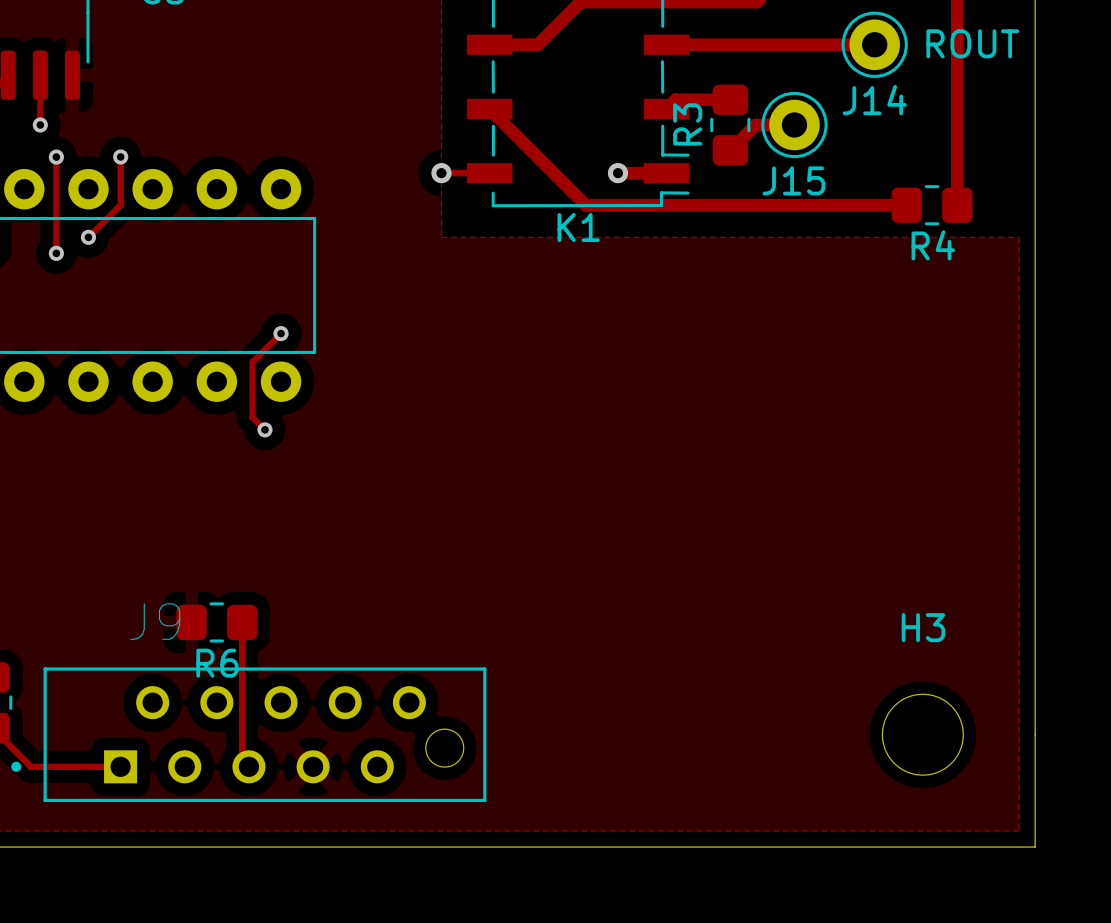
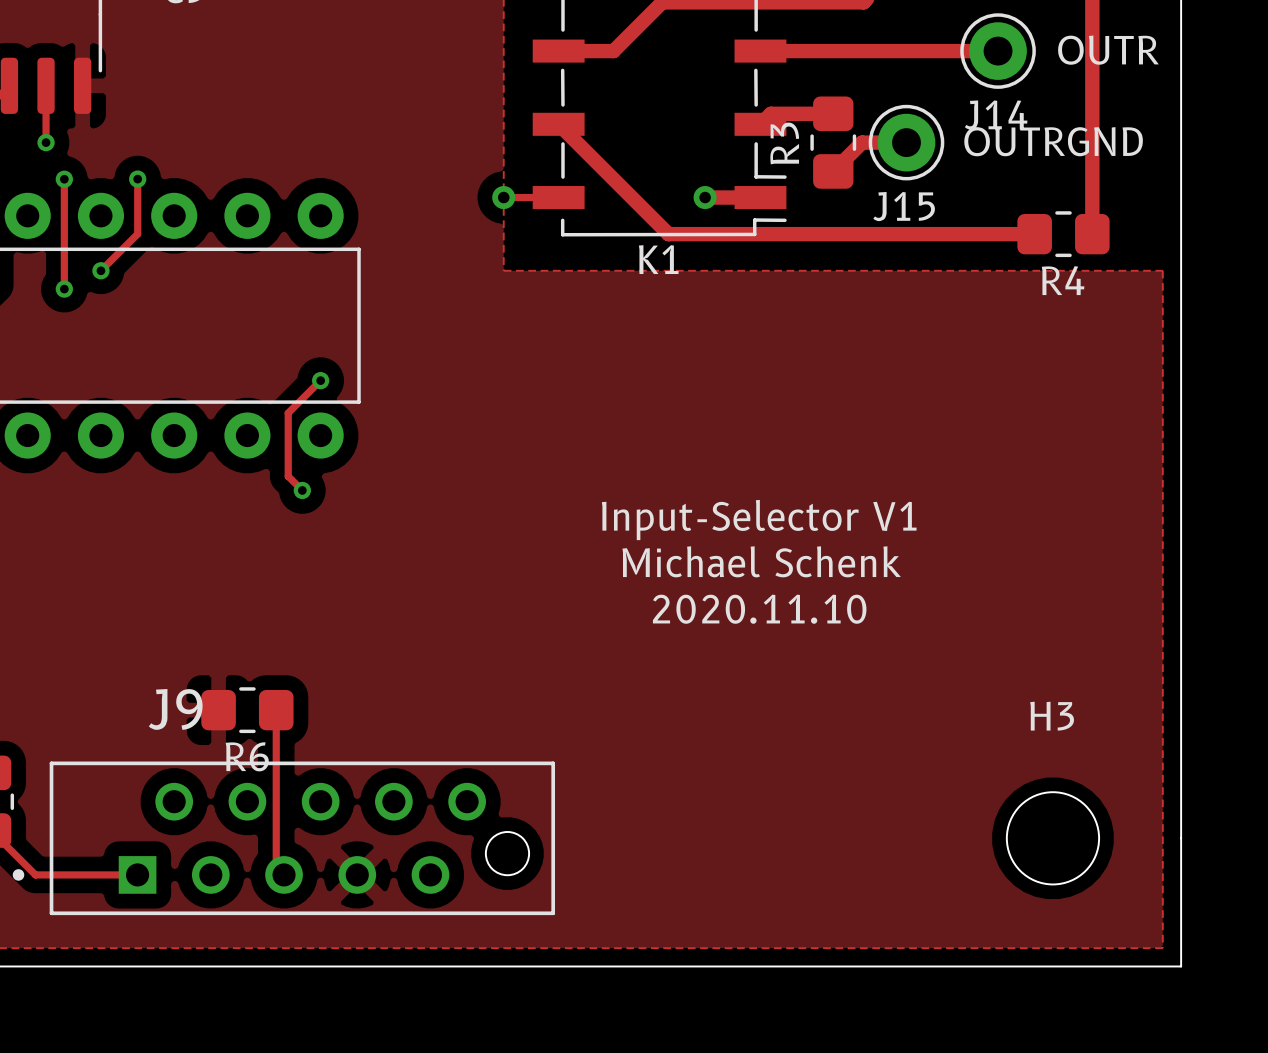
text: ROUT (972, 43) -> OUTR (1108, 50)
text: none -> OUTRGND (1053, 141)
text: none -> Input-Selector V1 (759, 520)
text: none -> Michael Schenk (761, 561)
text: none -> 2020.11.10 (759, 609)

